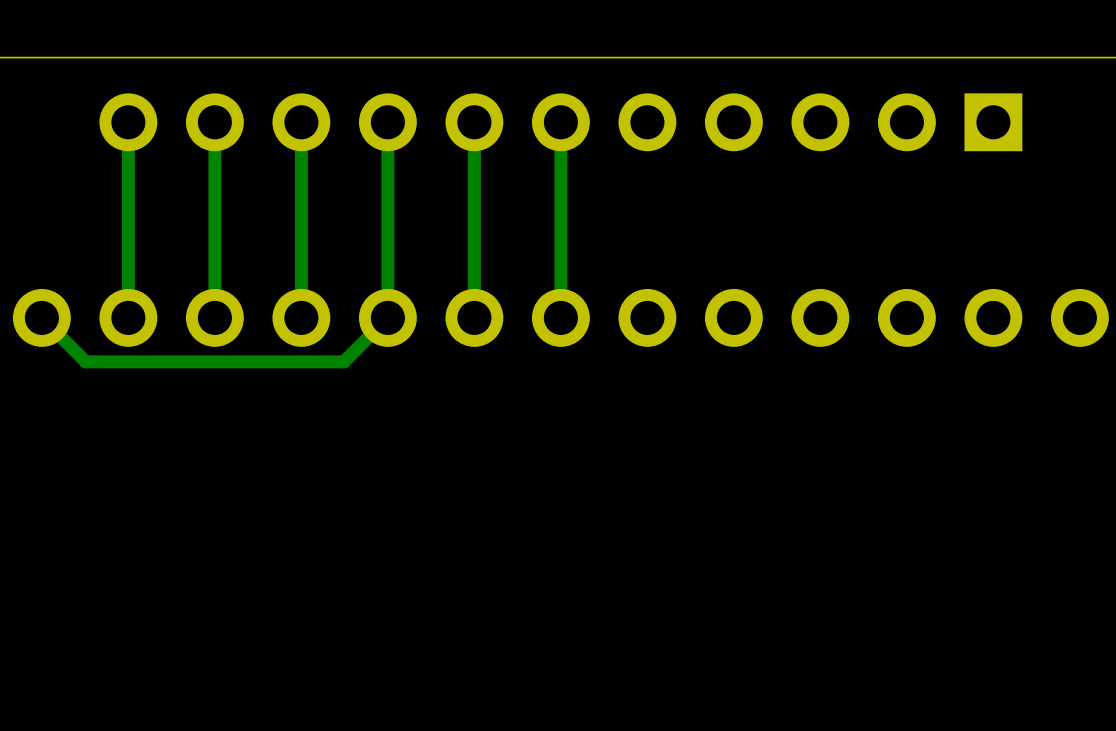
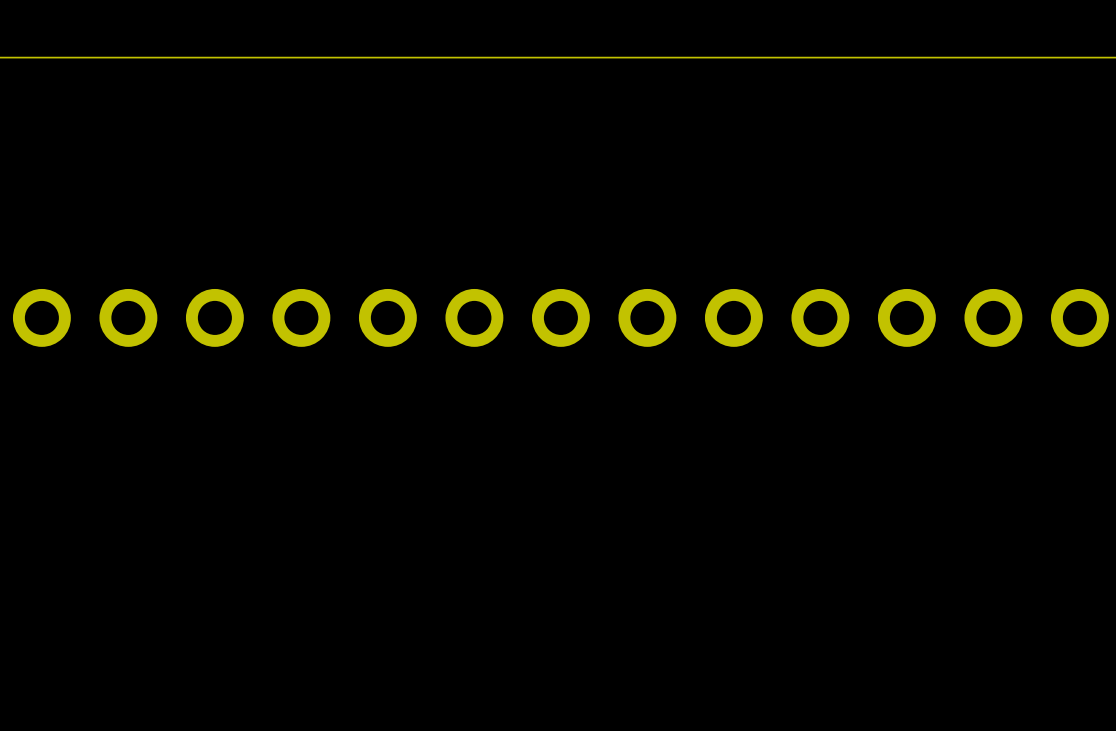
track: (128, 122) (128, 317) -> none
track: (214, 122) (214, 317) -> none
track: (301, 122) (301, 317) -> none
track: (387, 122) (387, 317) (343, 361) (85, 361) (41, 317) -> none
track: (474, 122) (474, 317) -> none
track: (560, 122) (560, 317) -> none
part: (560, 122) -> none

